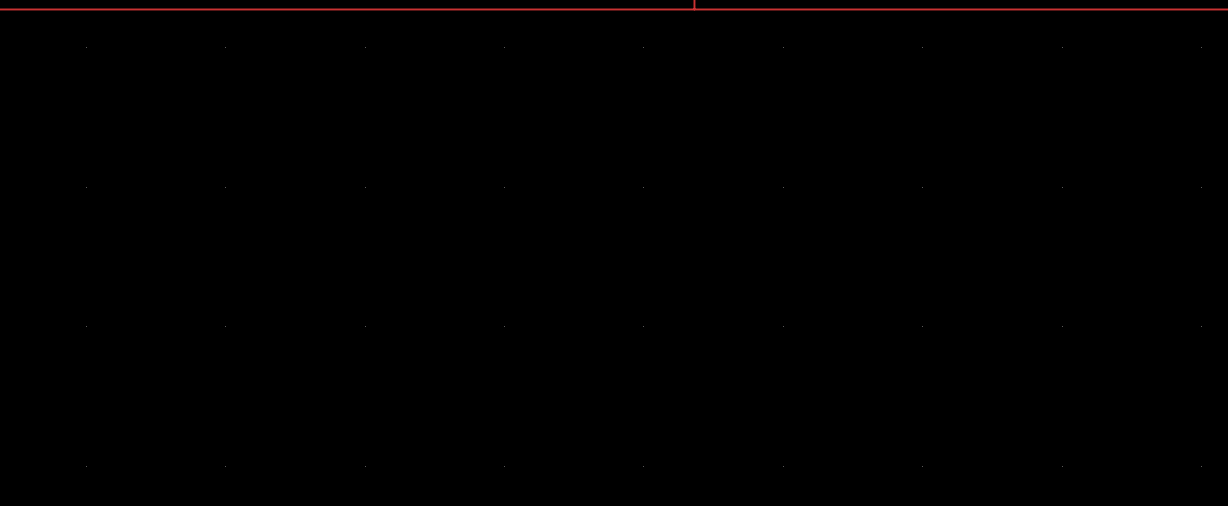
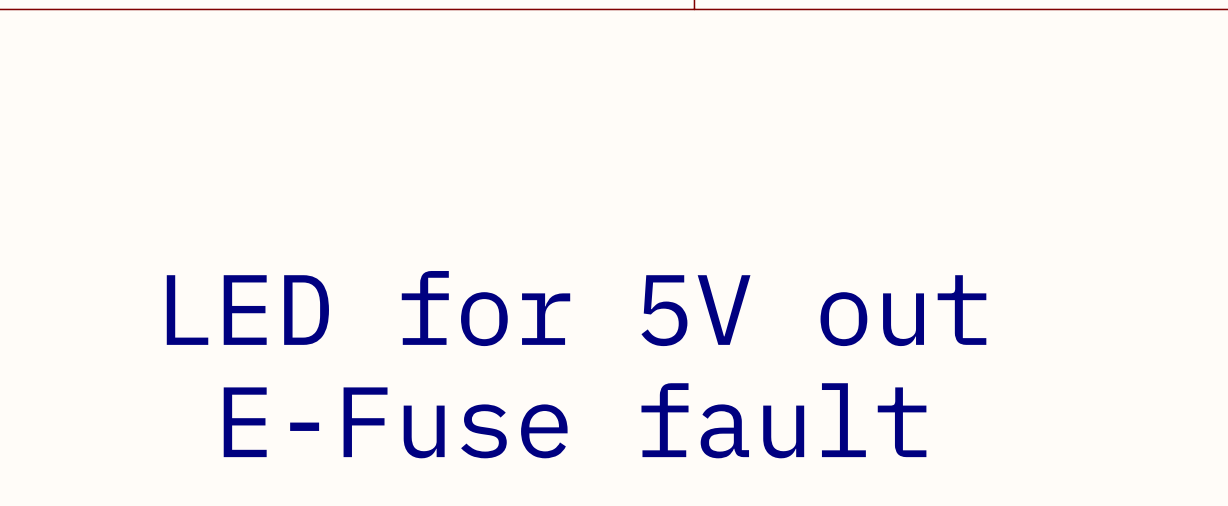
text: none -> LED for 5V out (576, 308)
text: none -> E-Fuse fault (575, 420)

